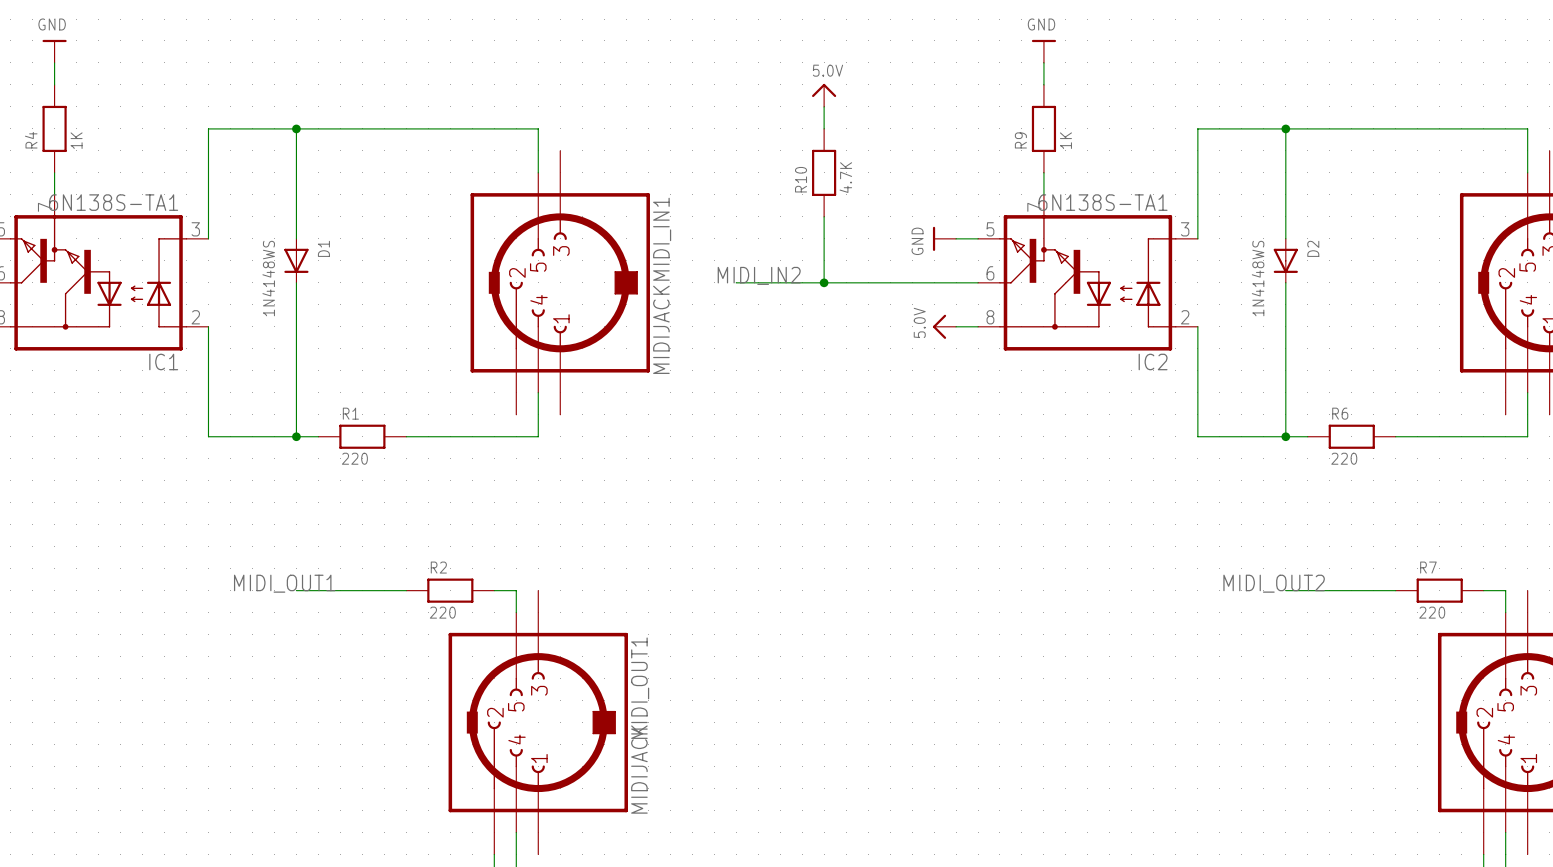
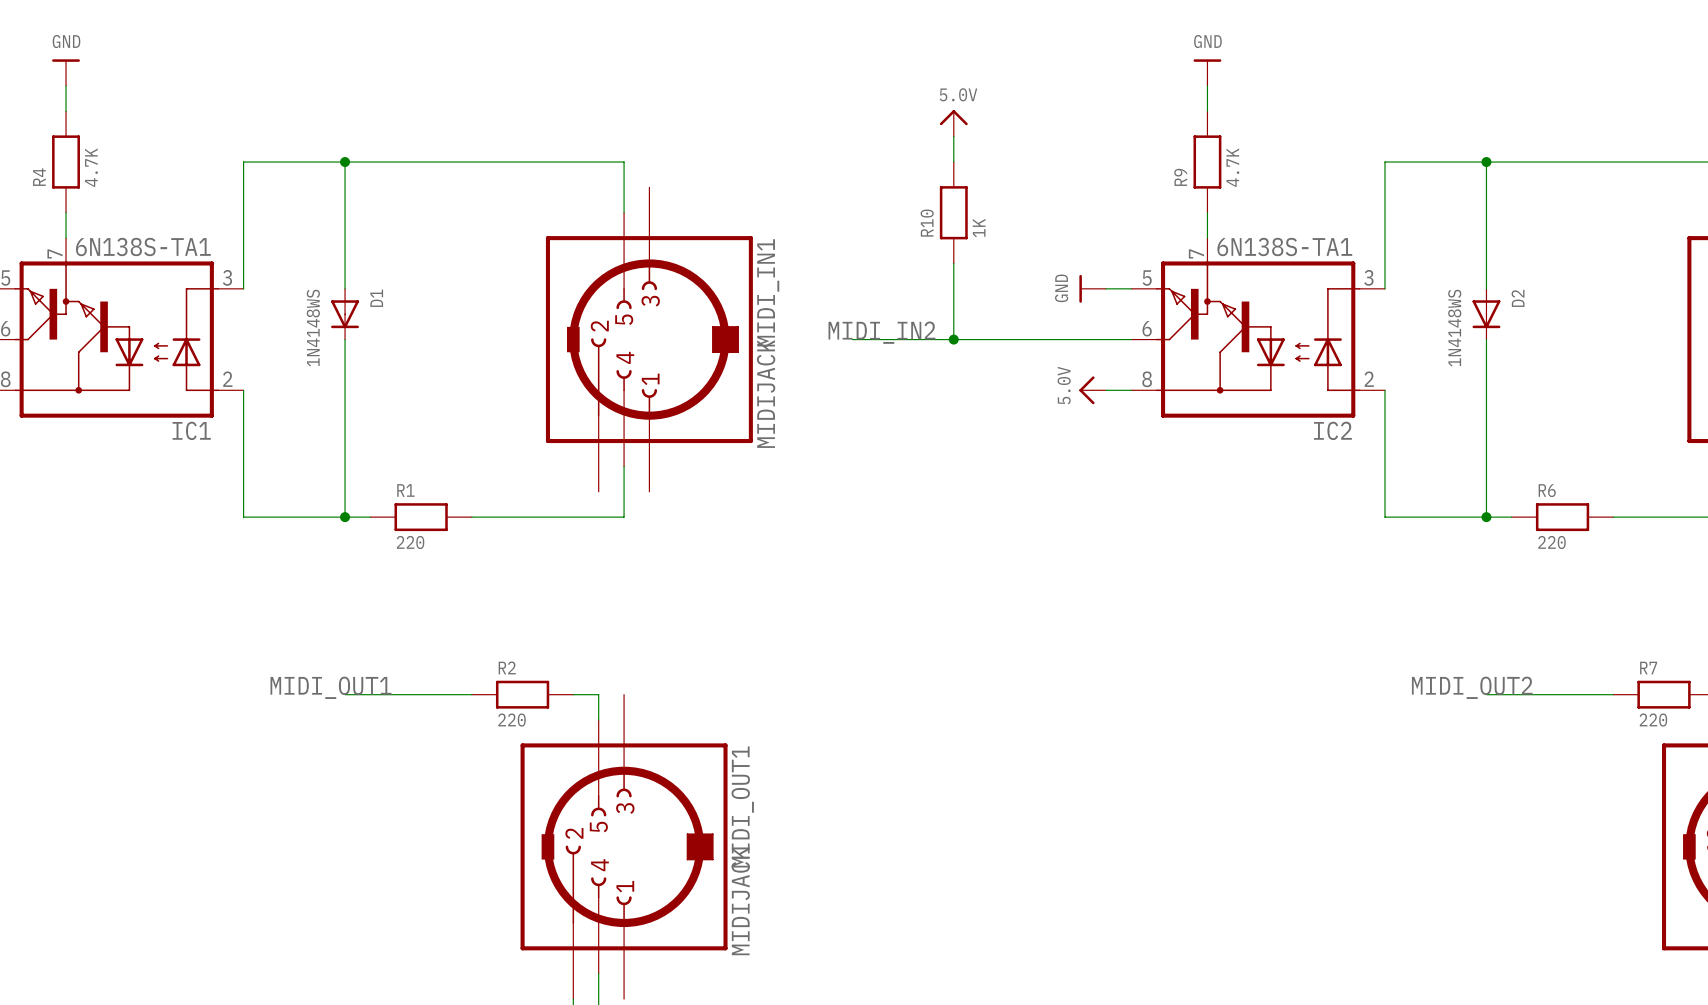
R4 value: 1K (76, 140) -> 4.7K (91, 167)
R9 value: 1K (1065, 140) -> 4.7K (1232, 167)
R10 value: 4.7K (845, 177) -> 1K (979, 228)

